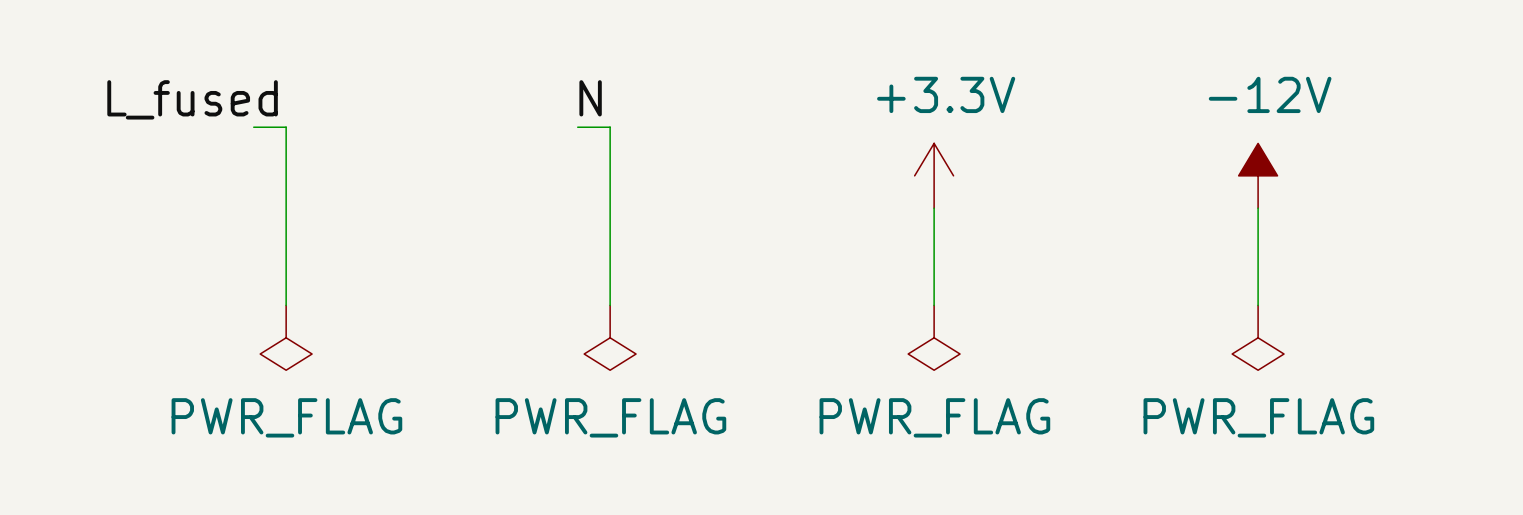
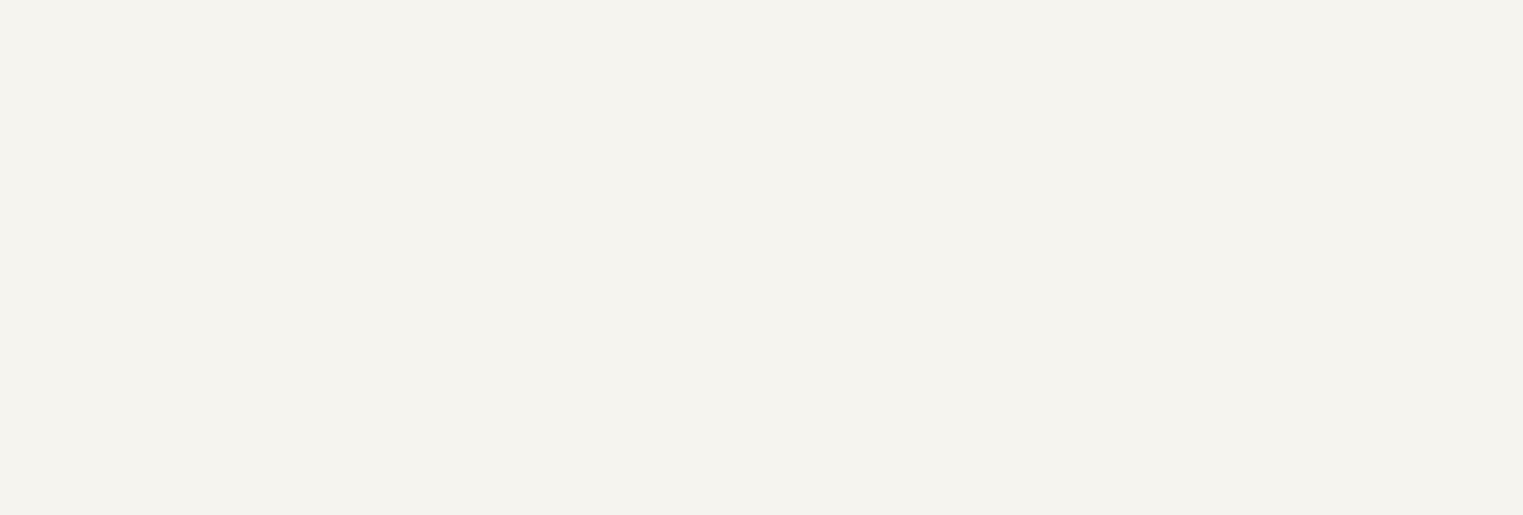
label: N (590, 98) -> none
label: L_fused (192, 99) -> none
wire: (253, 127) (286, 127) (286, 305) -> none
wire: (577, 127) (610, 127) (610, 305) -> none
power symbol: +3.3V (934, 175) -> none
power symbol: -12V (1258, 175) -> none
wire: (934, 208) (934, 305) -> none
wire: (1258, 208) (1258, 305) -> none
power symbol: PWR_FLAG (286, 337) -> none
power symbol: PWR_FLAG (610, 337) -> none
power symbol: PWR_FLAG (934, 337) -> none
power symbol: PWR_FLAG (1258, 337) -> none

